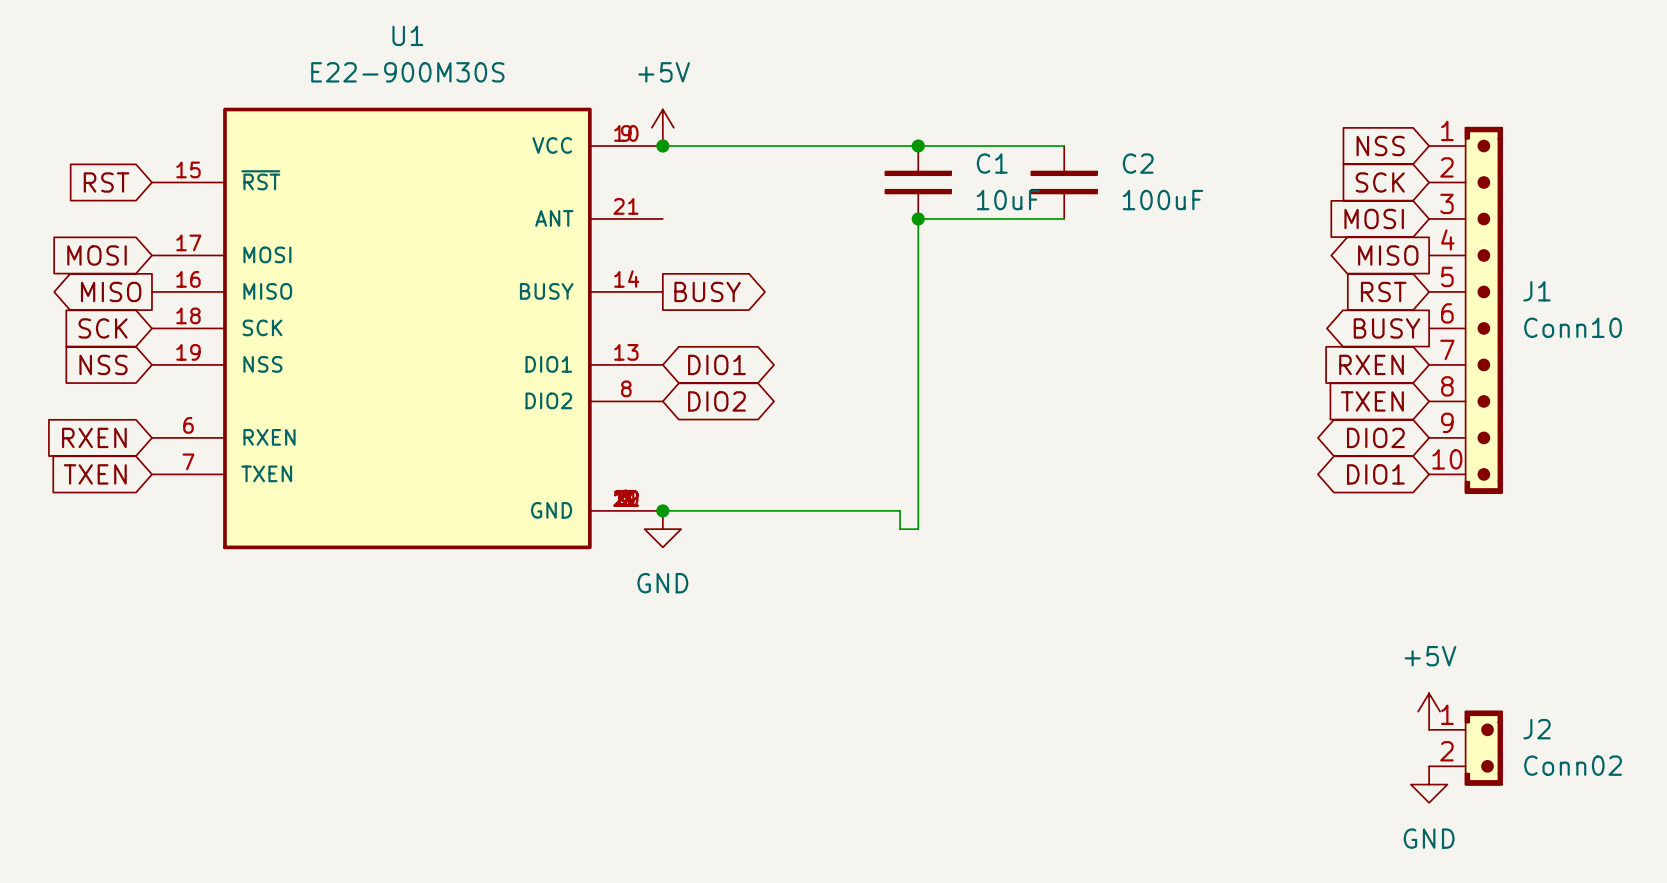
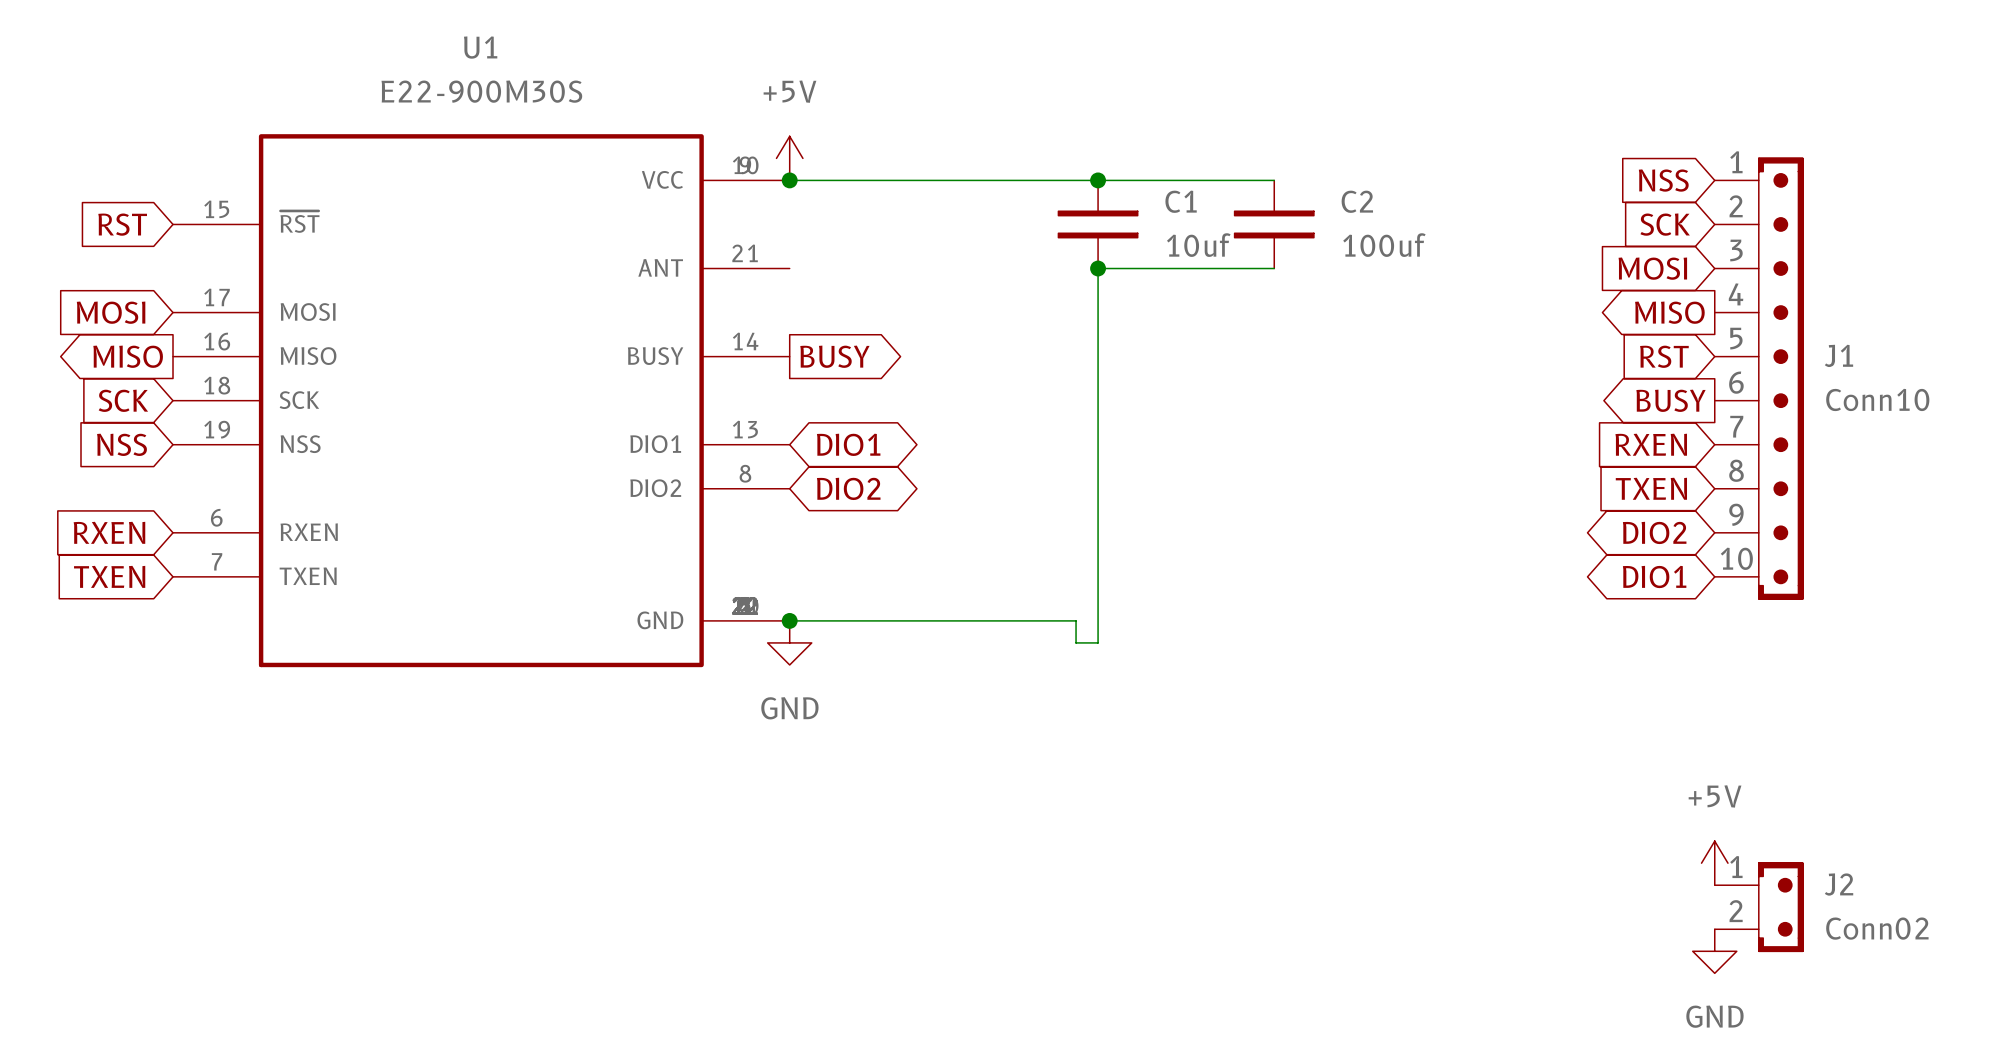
C1 value: 10uF (1008, 200) -> 10uf (1198, 245)
C2 value: 100uF (1162, 200) -> 100uf (1384, 245)

